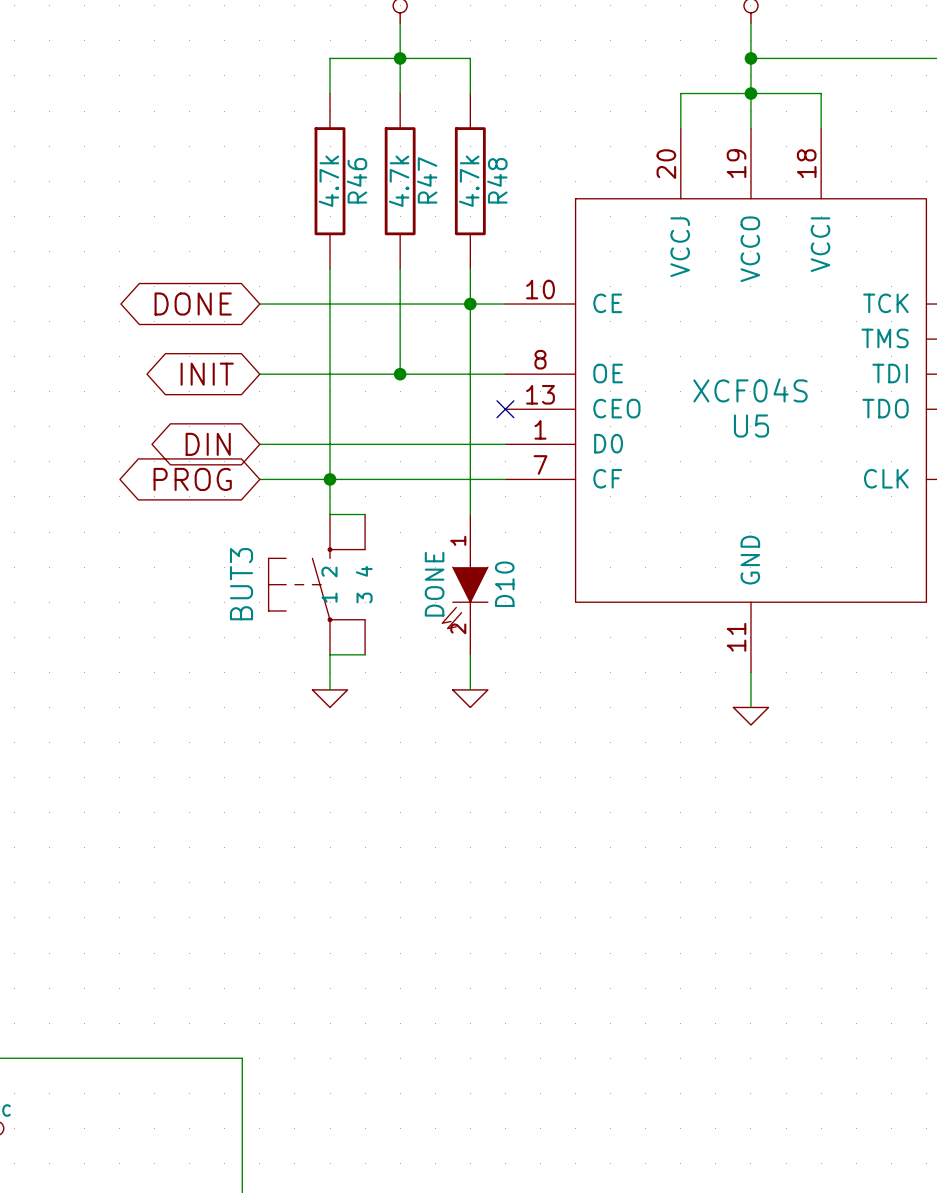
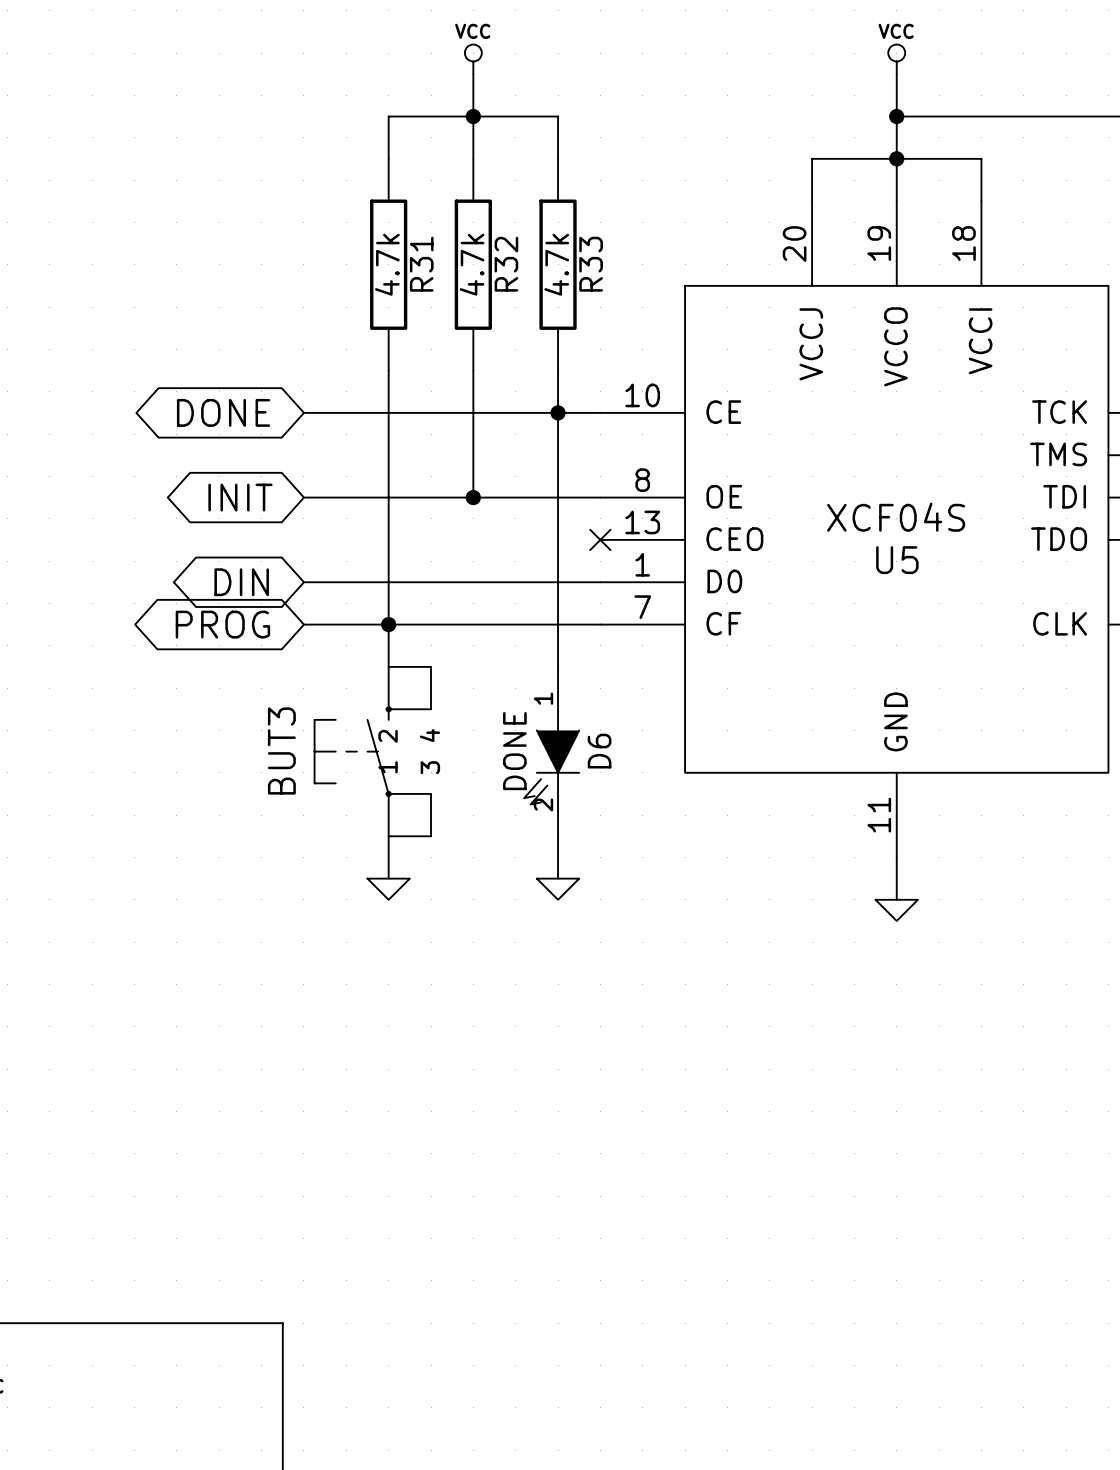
R46 name: R46 (356, 180) -> R31 (421, 264)
R47 name: R47 (427, 180) -> R32 (506, 264)
R48 name: R48 (497, 180) -> R33 (591, 264)
D10 name: D10 (504, 584) -> D6 (599, 751)

